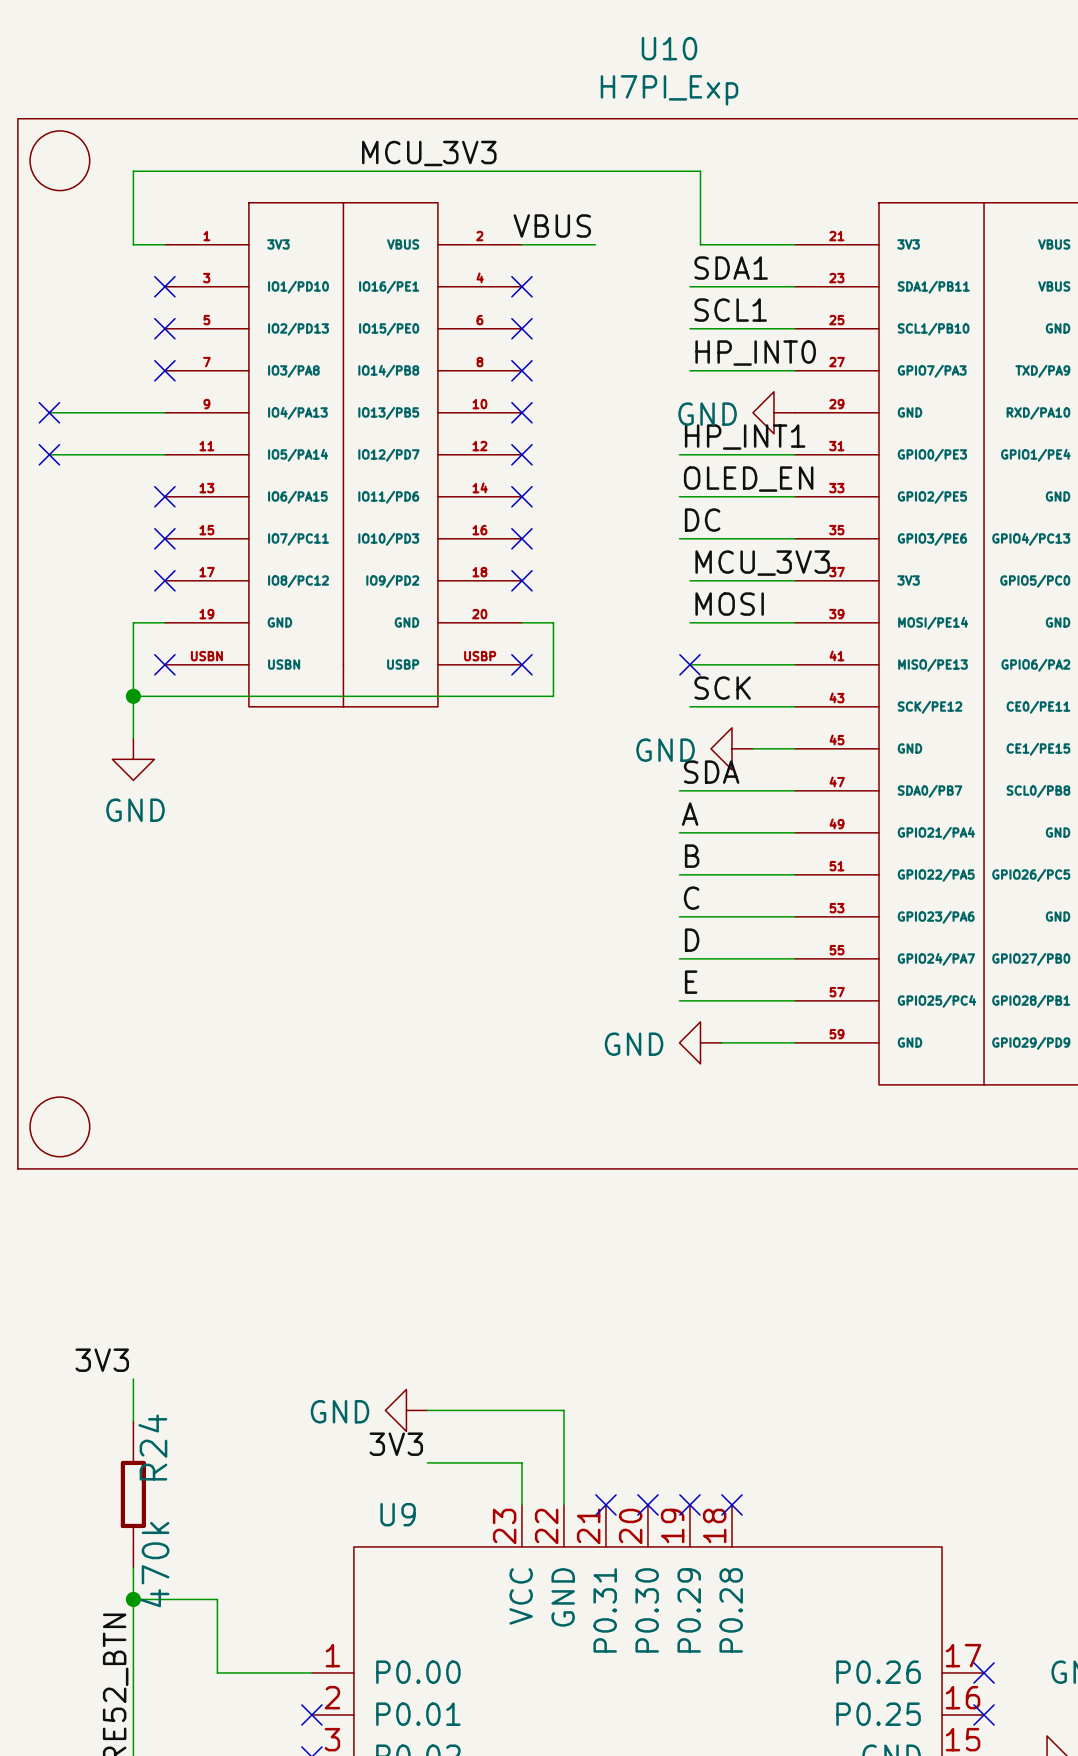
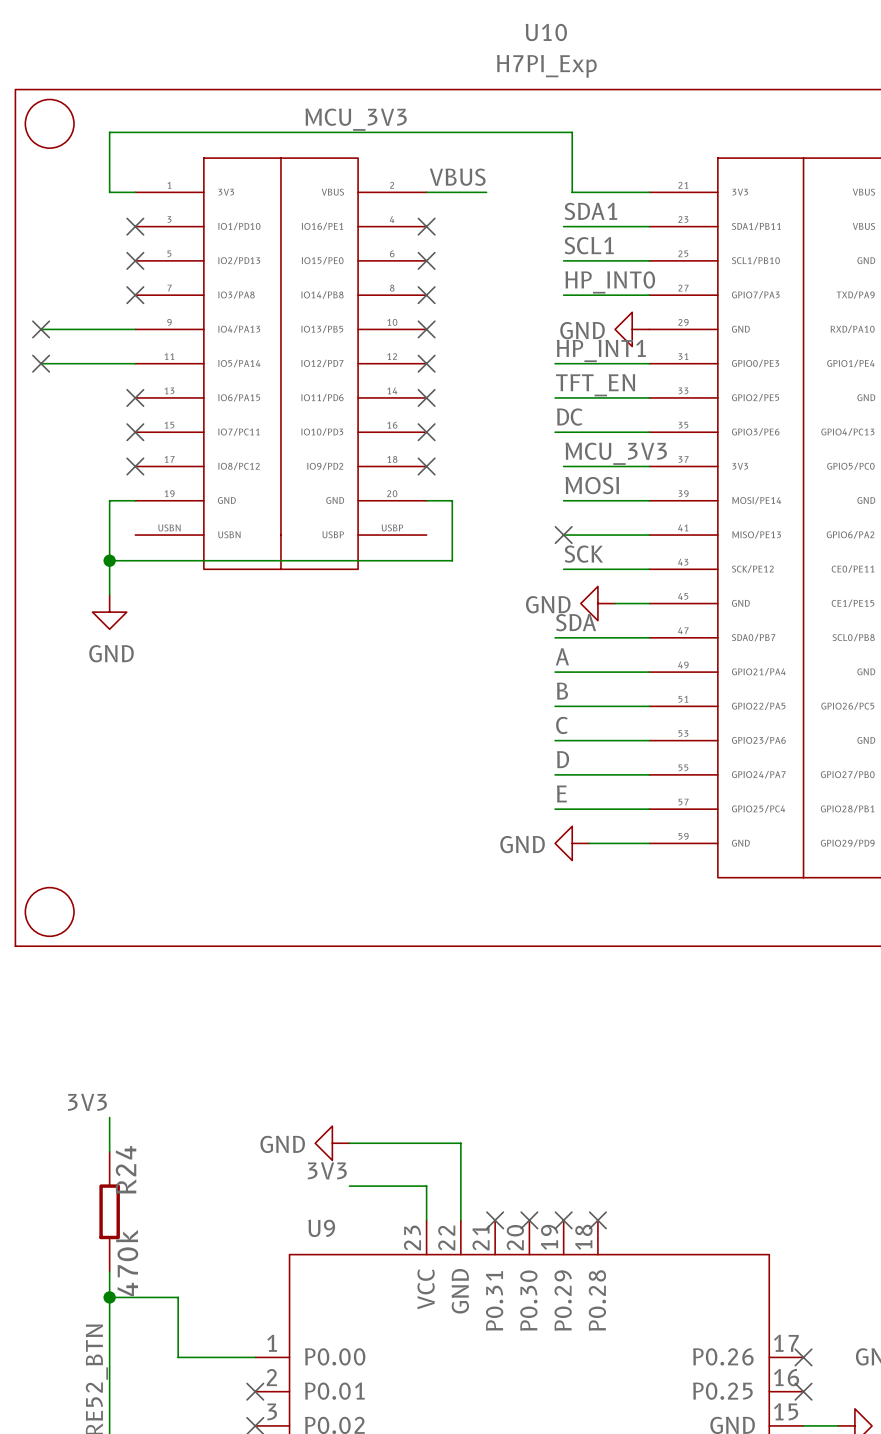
label: OLED_EN (748, 479) -> TFT_EN (595, 385)
no-connect mark: (164, 664) -> none
no-connect mark: (521, 664) -> none

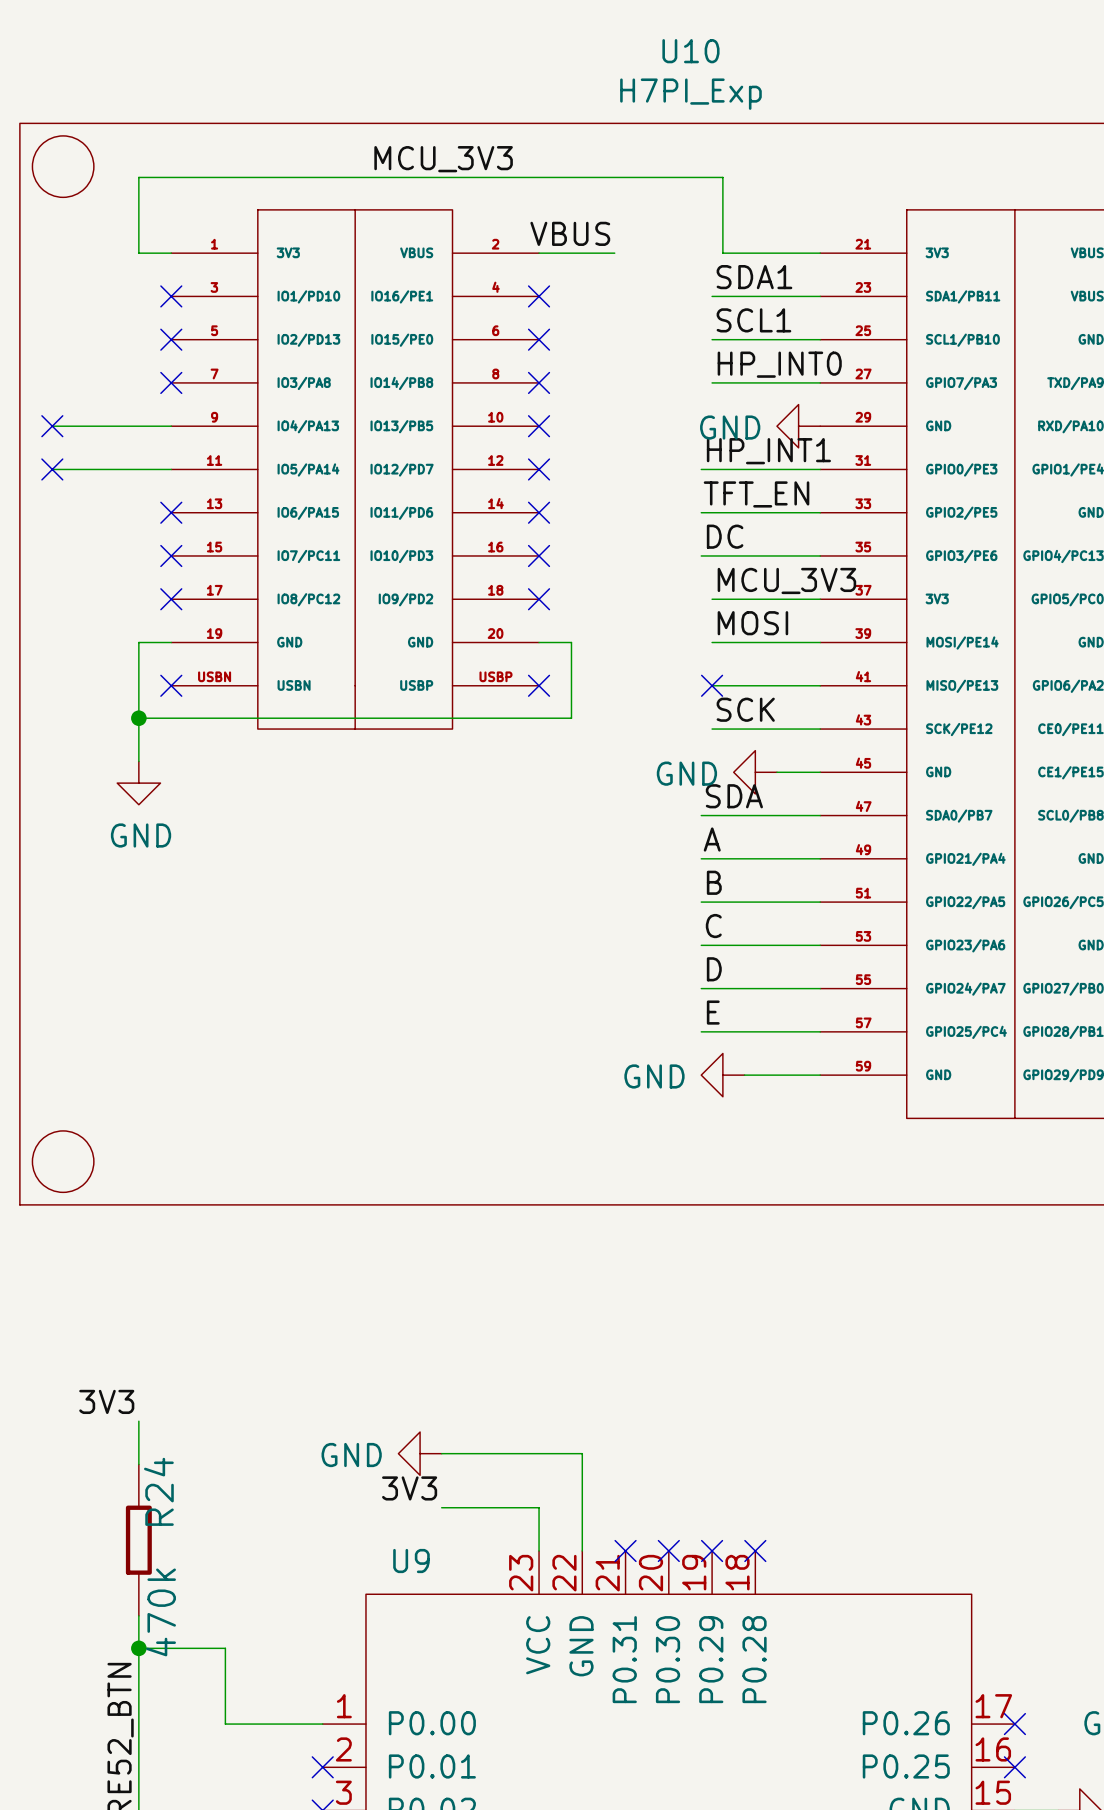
no-connect mark: none -> (171, 685)
no-connect mark: none -> (539, 685)

